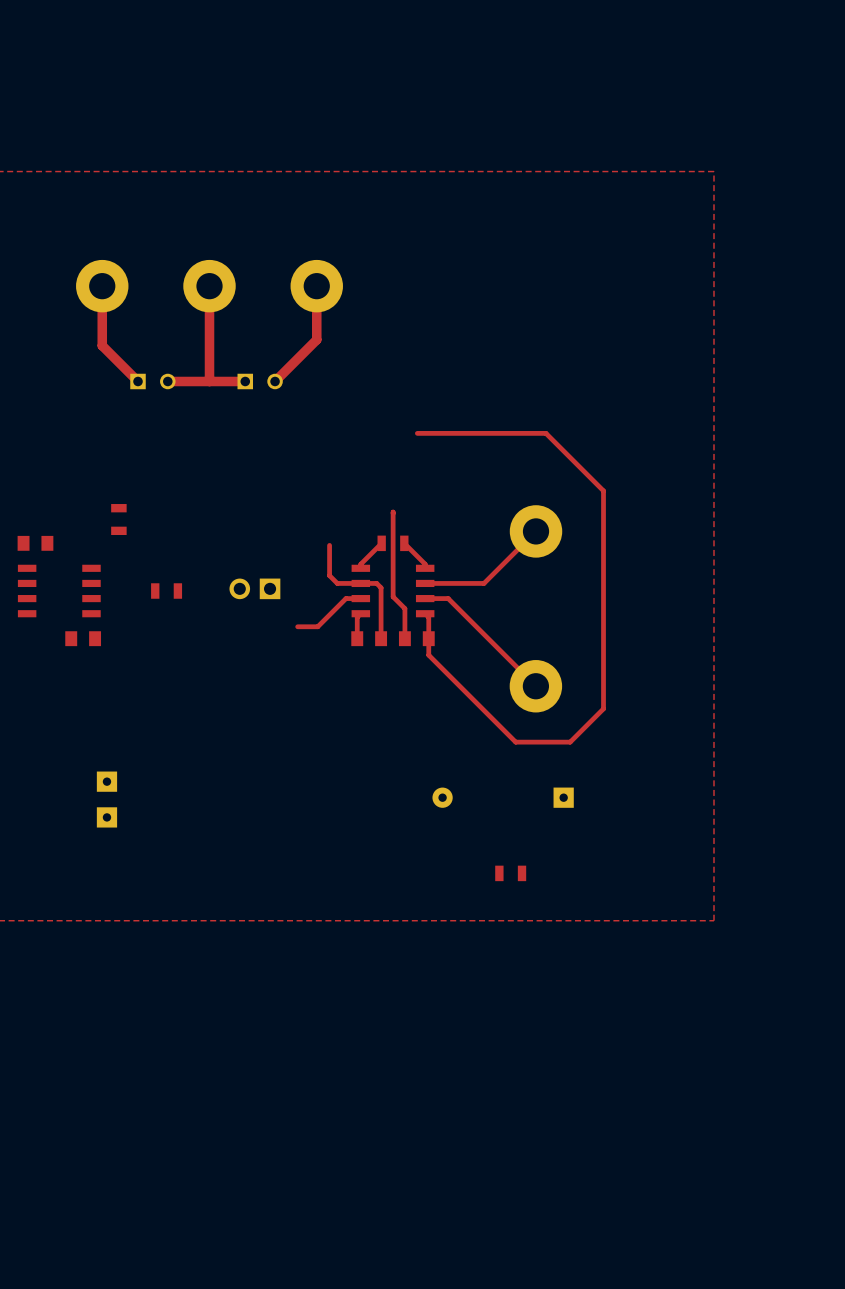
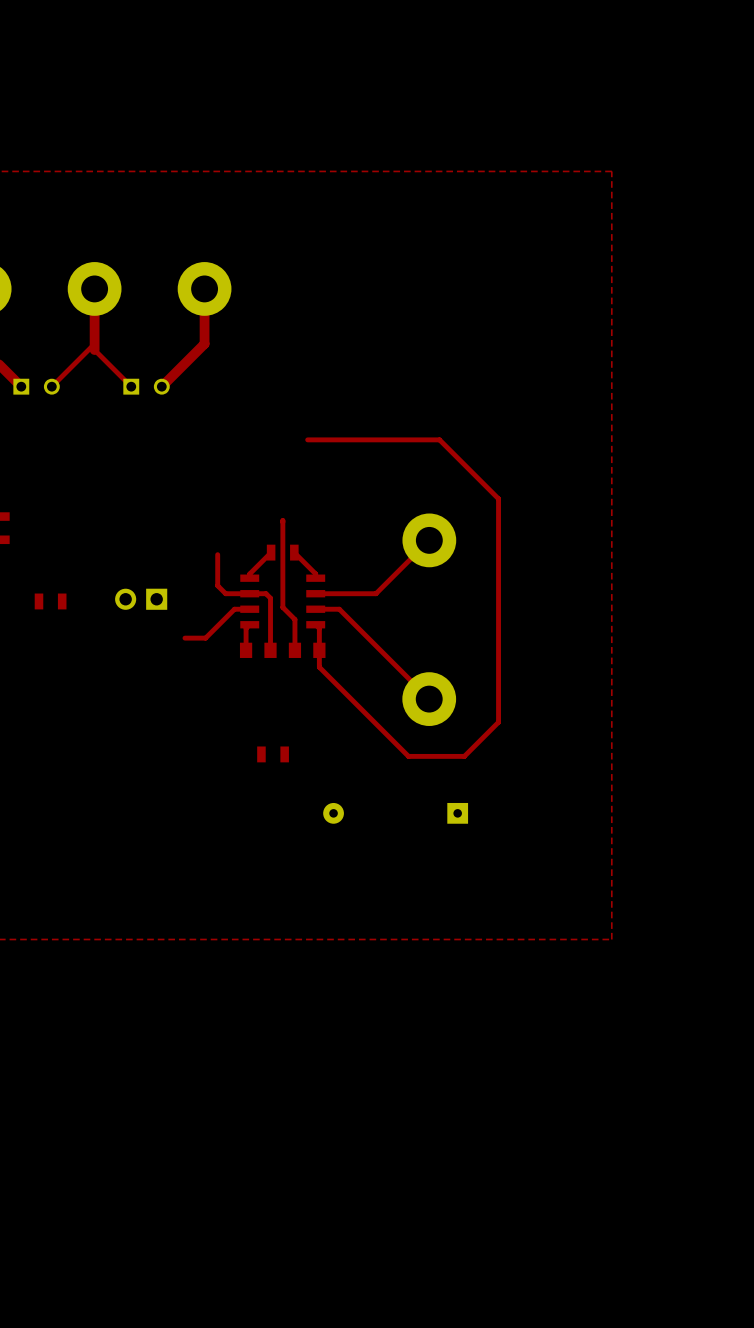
top track: (209, 345) (209, 381) -> (94, 350) (131, 386)
top track: (245, 381) (167, 381) -> (94, 343) (51, 386)
part position: (510, 873) -> (273, 754)

